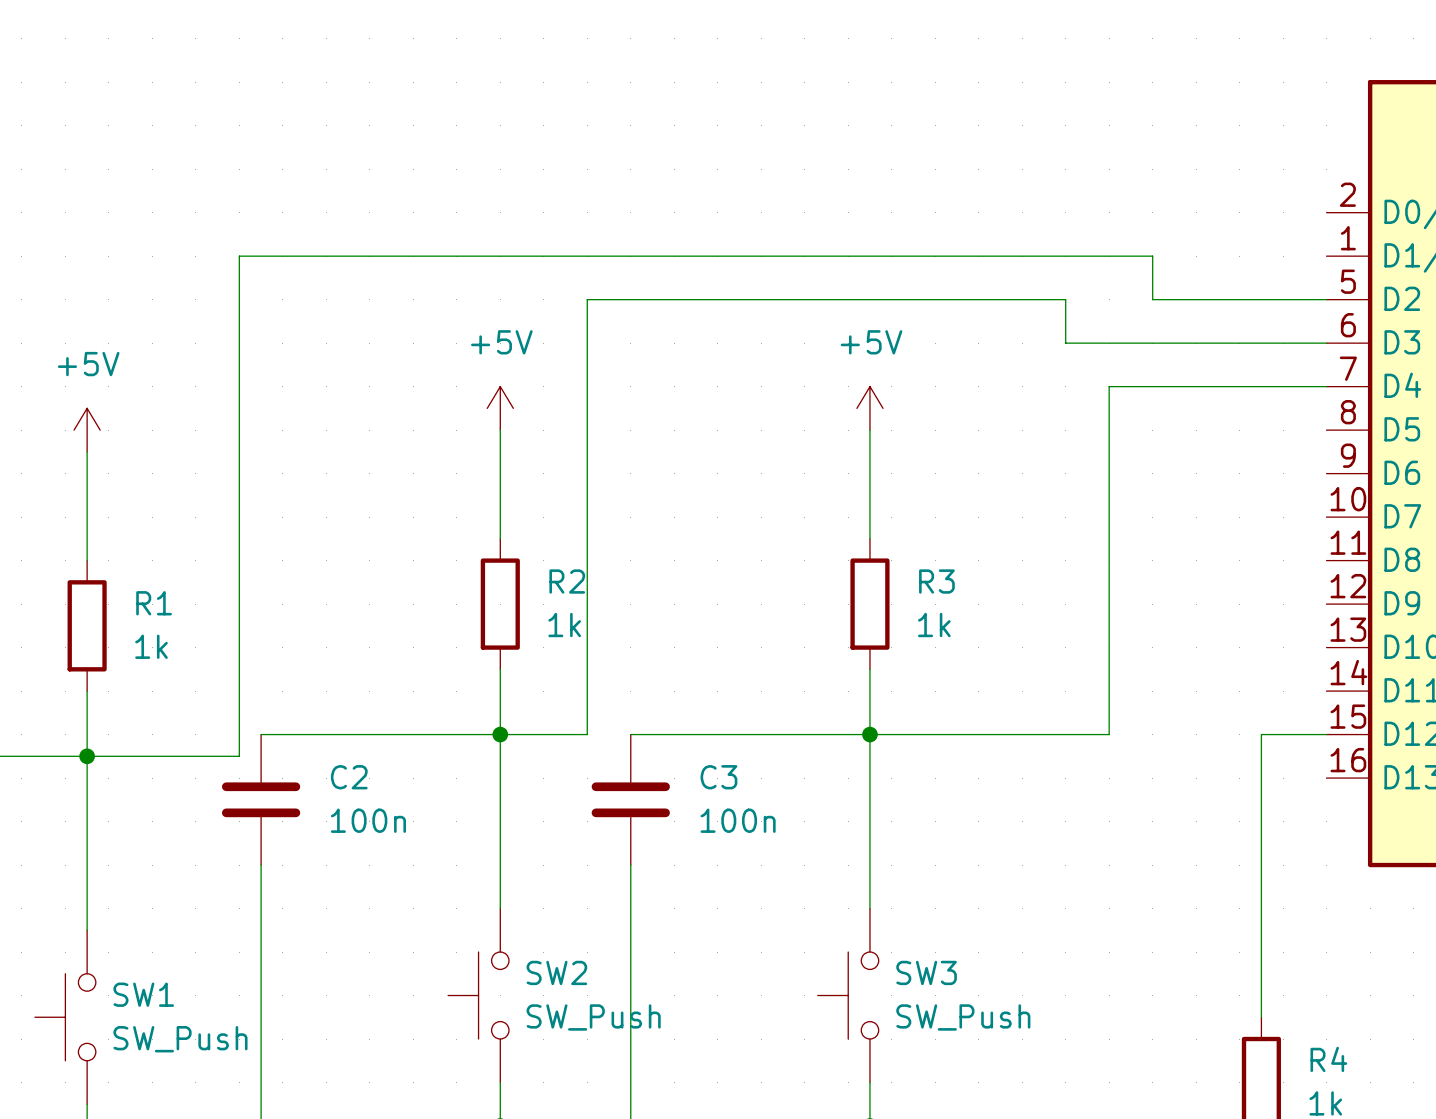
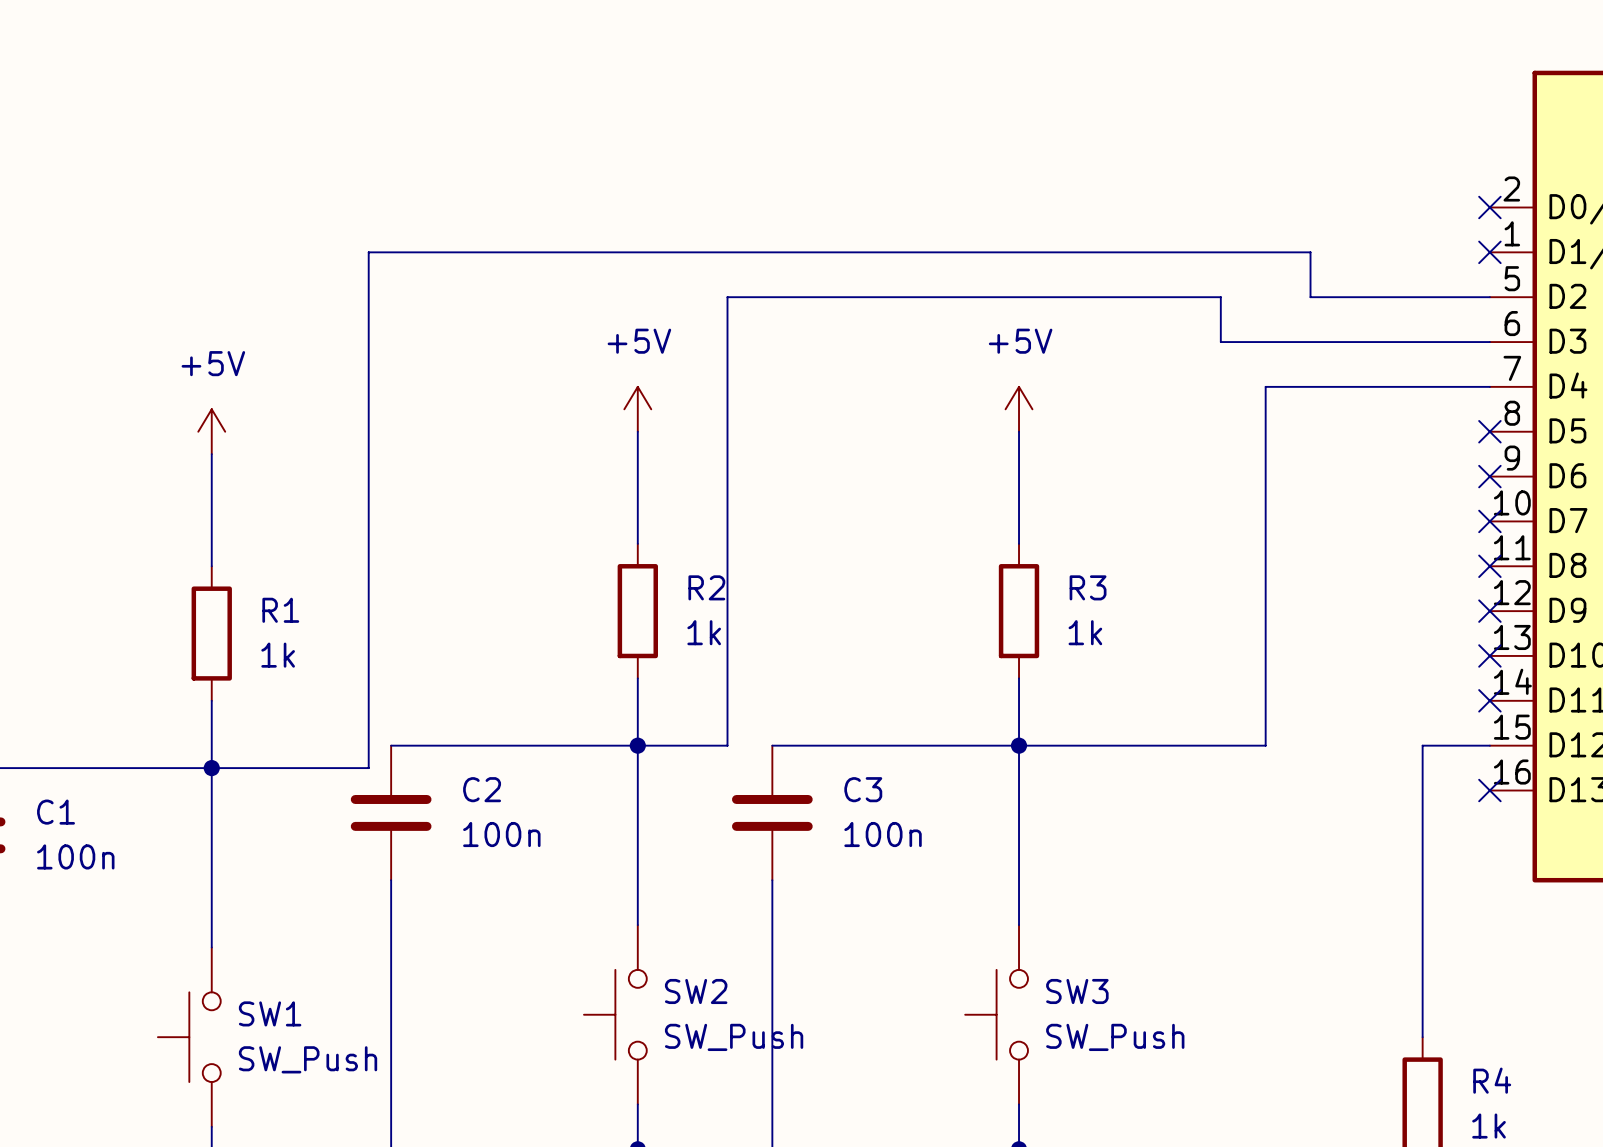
no-connect mark: none -> (1489, 207)
no-connect mark: none -> (1489, 252)
no-connect mark: none -> (1489, 431)
no-connect mark: none -> (1489, 476)
no-connect mark: none -> (1489, 521)
no-connect mark: none -> (1489, 566)
no-connect mark: none -> (1489, 611)
no-connect mark: none -> (1489, 655)
no-connect mark: none -> (1489, 700)
no-connect mark: none -> (1489, 790)

